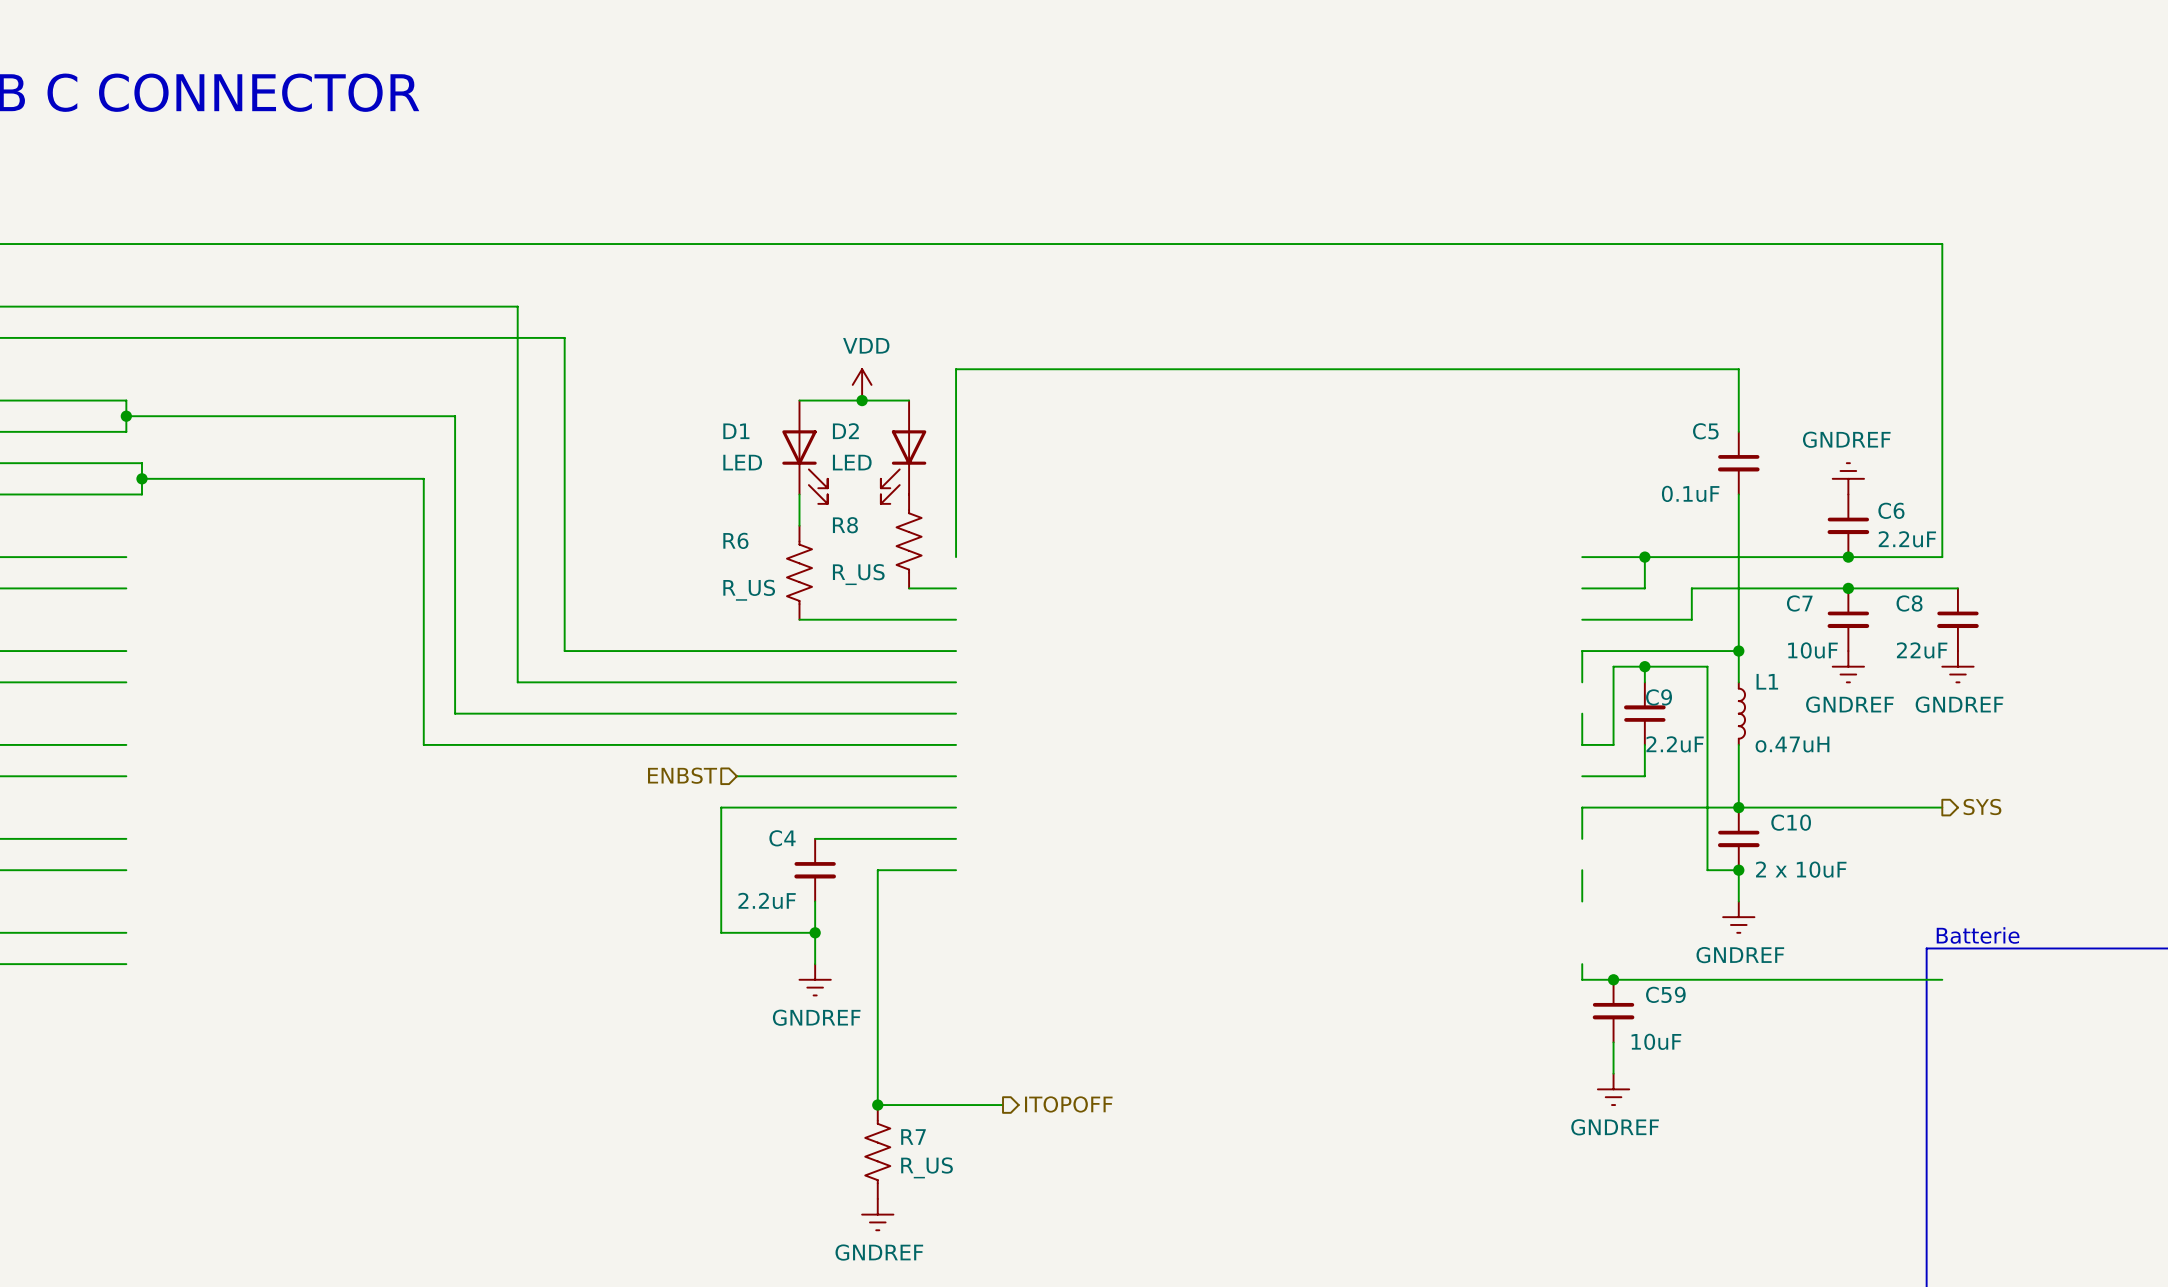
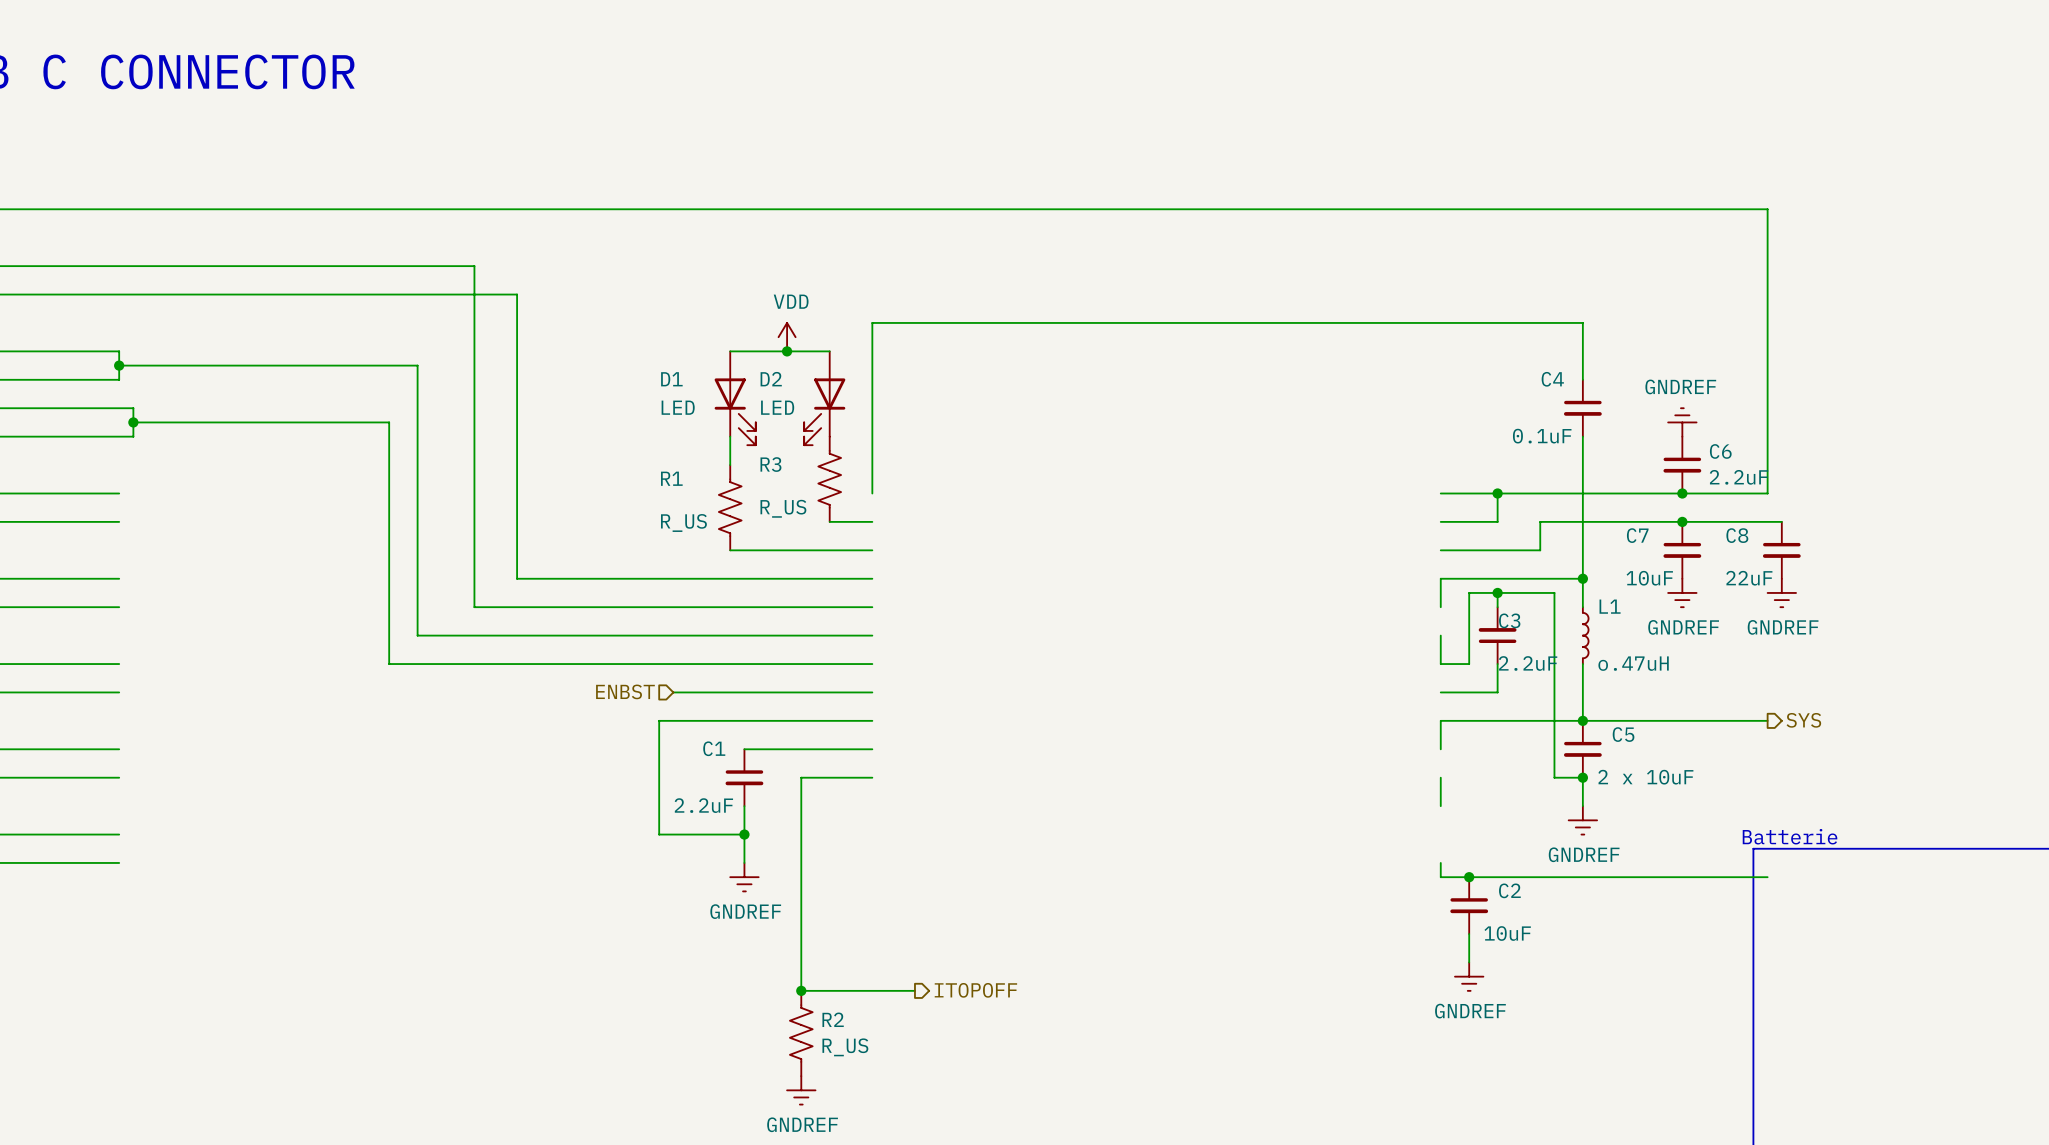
C5 name: C5 (1705, 431) -> C4 (1552, 379)
R8 name: R8 (845, 525) -> R3 (770, 464)
R6 name: R6 (735, 540) -> R1 (671, 478)
C9 name: C9 (1659, 697) -> C3 (1509, 620)
C10 name: C10 (1791, 822) -> C5 (1623, 734)
C4 name: C4 (782, 838) -> C1 (714, 748)
C59 name: C59 (1665, 994) -> C2 (1509, 890)
R7 name: R7 (913, 1137) -> R2 (833, 1019)

